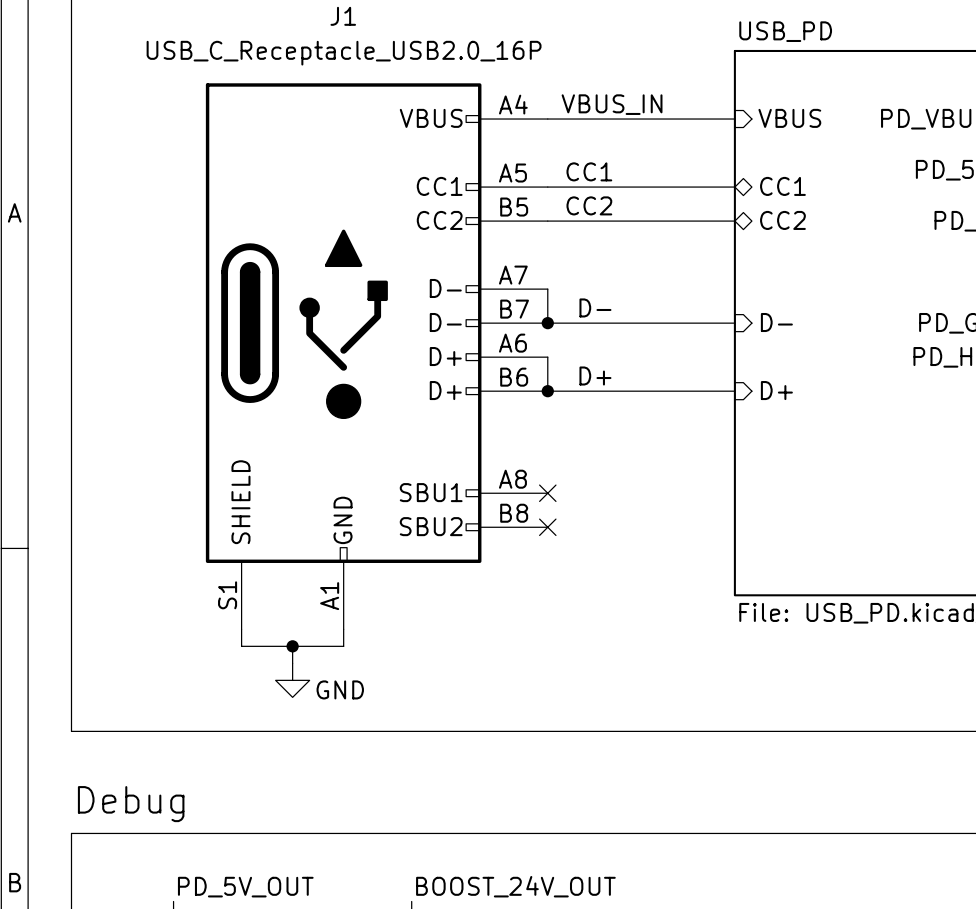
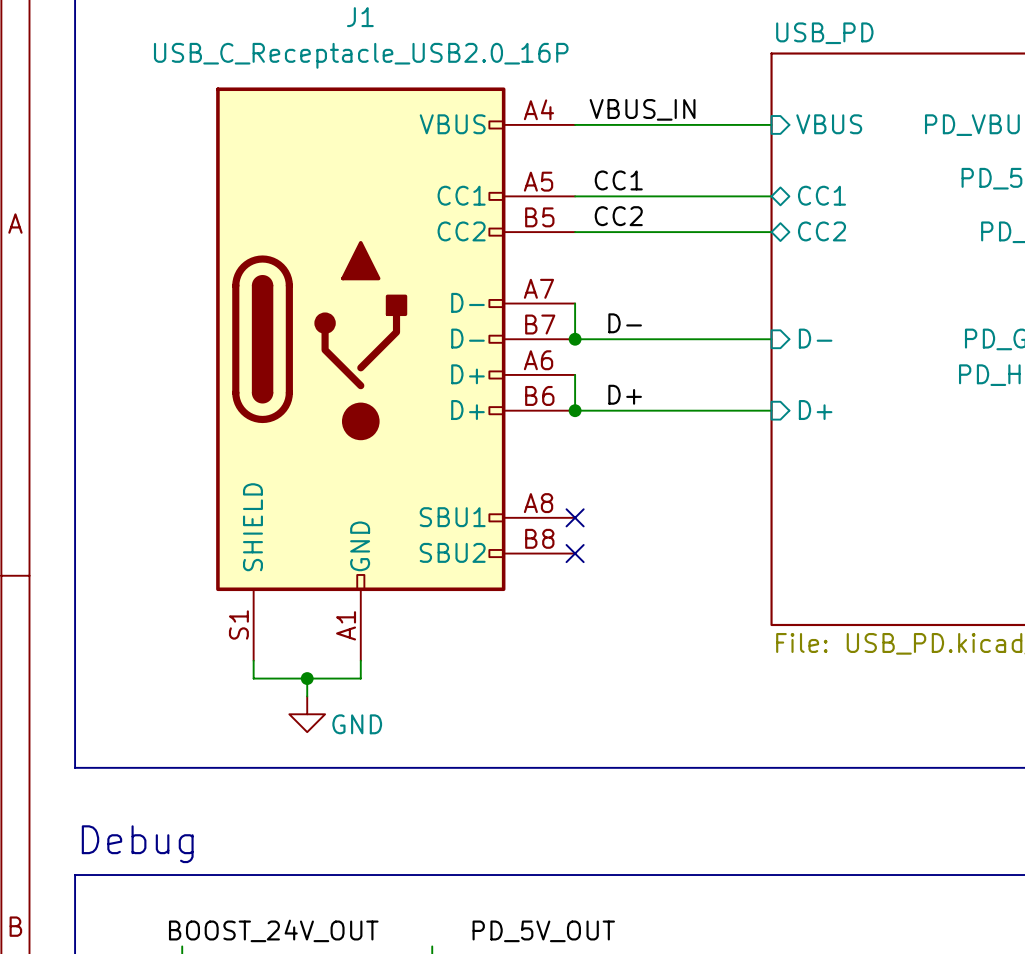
label position: BOOST_24V_OUT (515, 886) -> BOOST_24V_OUT (273, 930)
label position: PD_5V_OUT (245, 887) -> PD_5V_OUT (543, 931)

